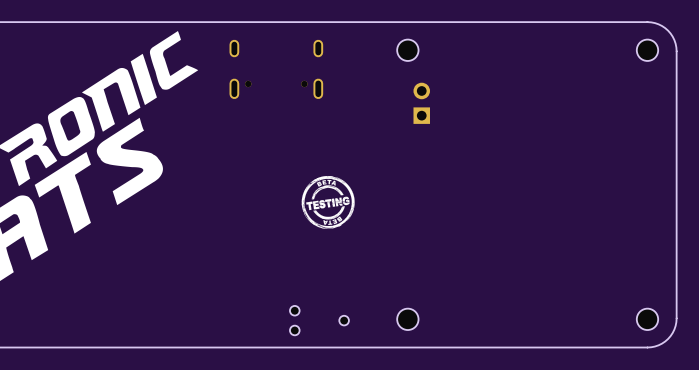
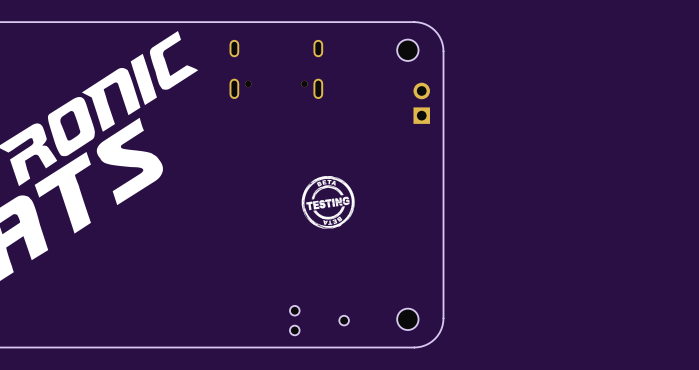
board edge: (414, 22) (651, 22) (668, 30) (674, 40) (676, 51) (676, 318) (674, 329) (668, 338) (658, 345) (647, 347) (414, 347) -> (414, 22) (425, 24) (434, 30) (441, 40) (443, 51) (443, 322) (434, 338) (425, 345) (414, 347)
part: (647, 50) -> none
part: (647, 319) -> none

